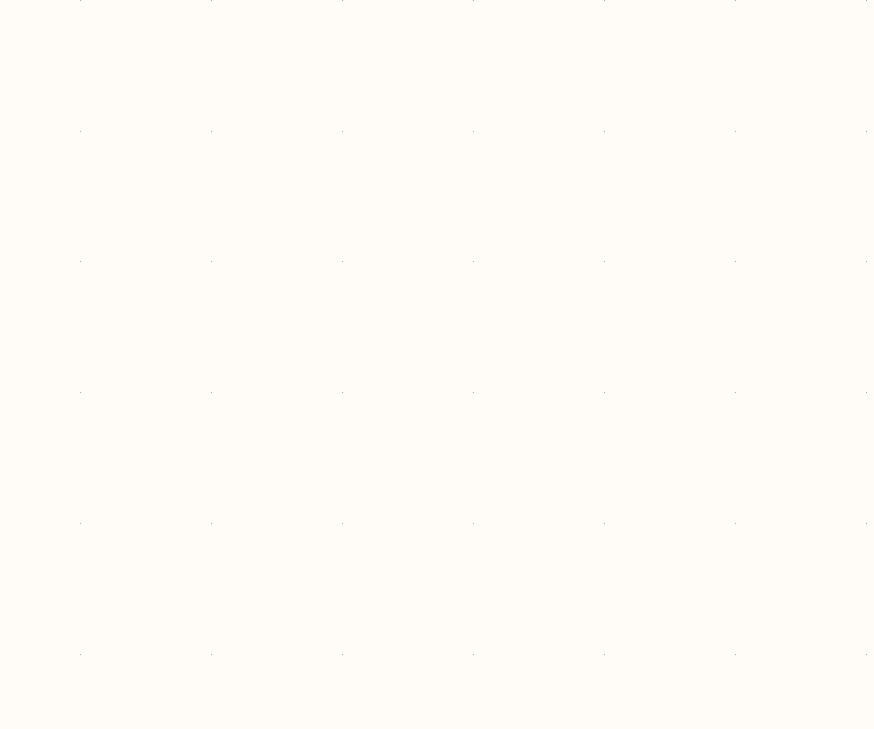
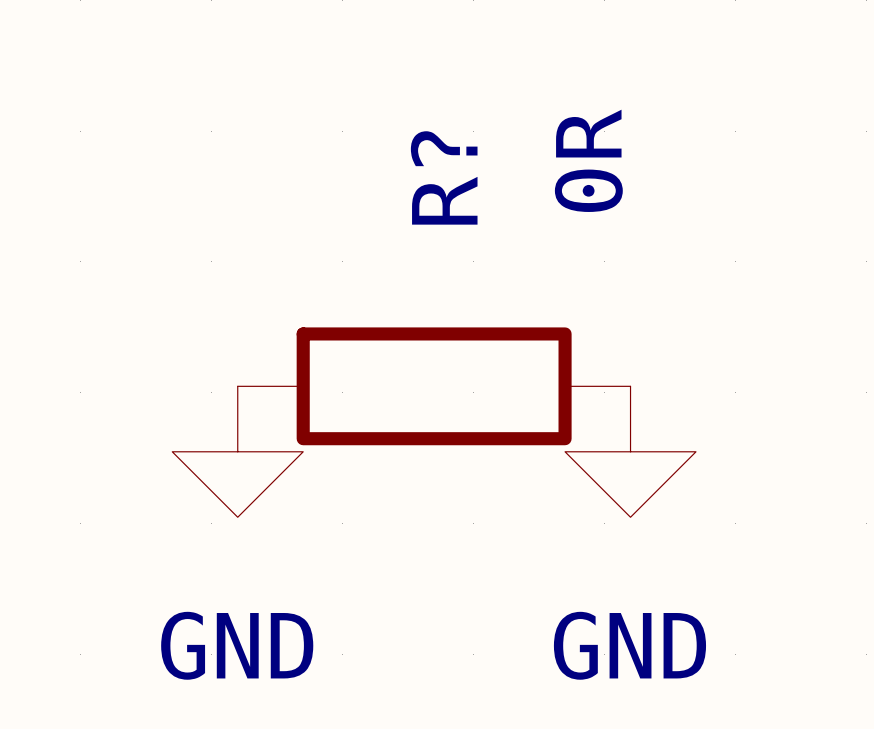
R?: none -> 0R (434, 386)
power symbol: none -> GND (237, 451)
power symbol: none -> GND (630, 451)

